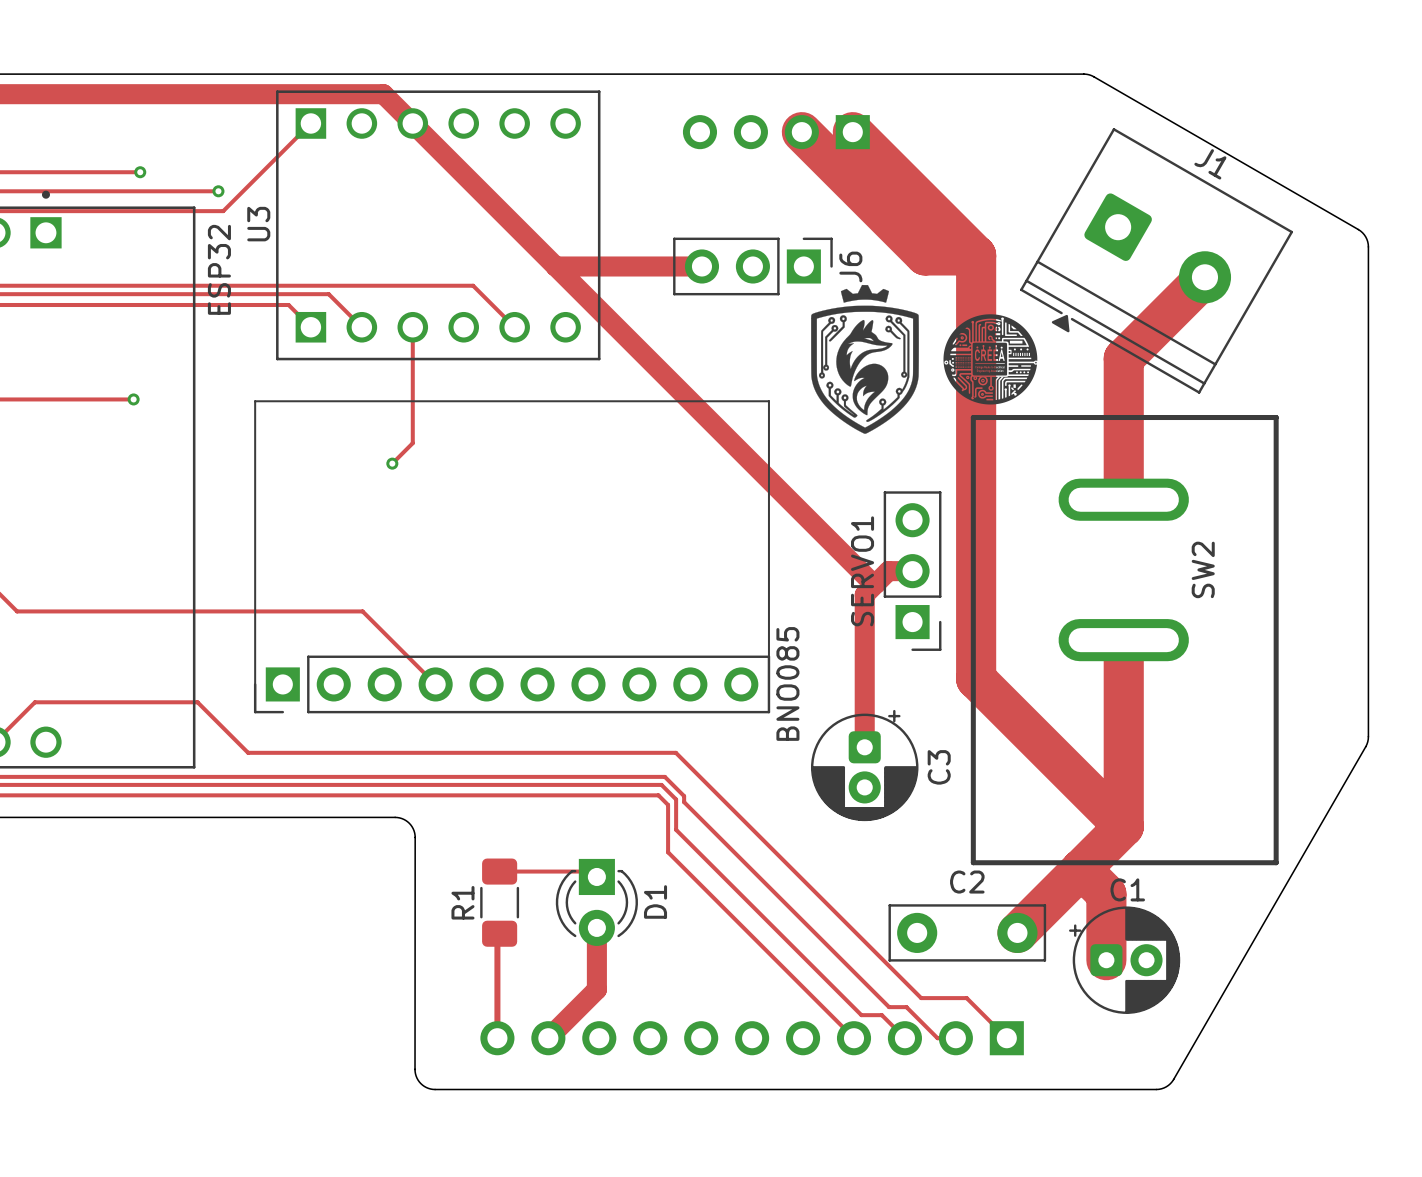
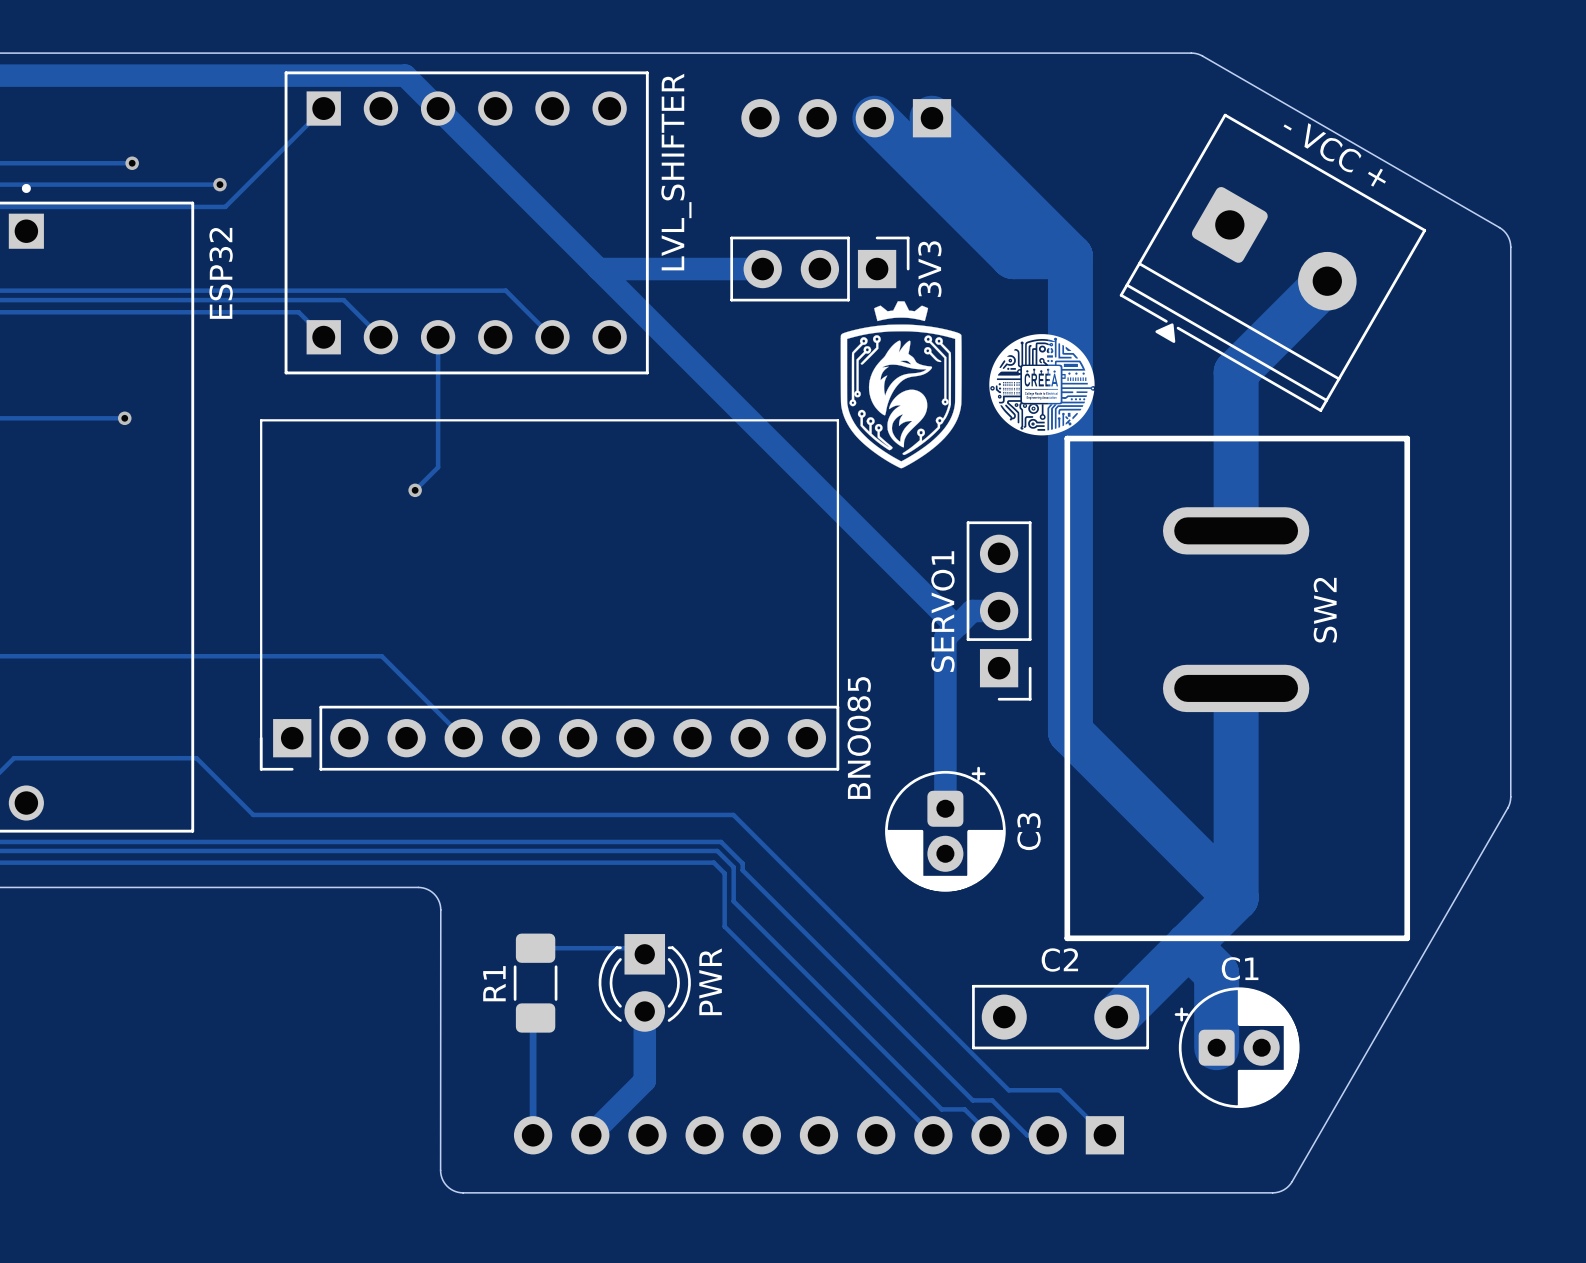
J1 name: J1 (1210, 164) -> - VCC + (1334, 154)
U3 name: U3 (258, 224) -> LVL_SHIFTER (676, 172)
J6 name: J6 (850, 266) -> 3V3 (929, 269)
drawing position: (864, 359) -> (901, 384)
drawing position: (990, 359) -> (1041, 384)
D1 name: D1 (655, 901) -> PWR (710, 981)

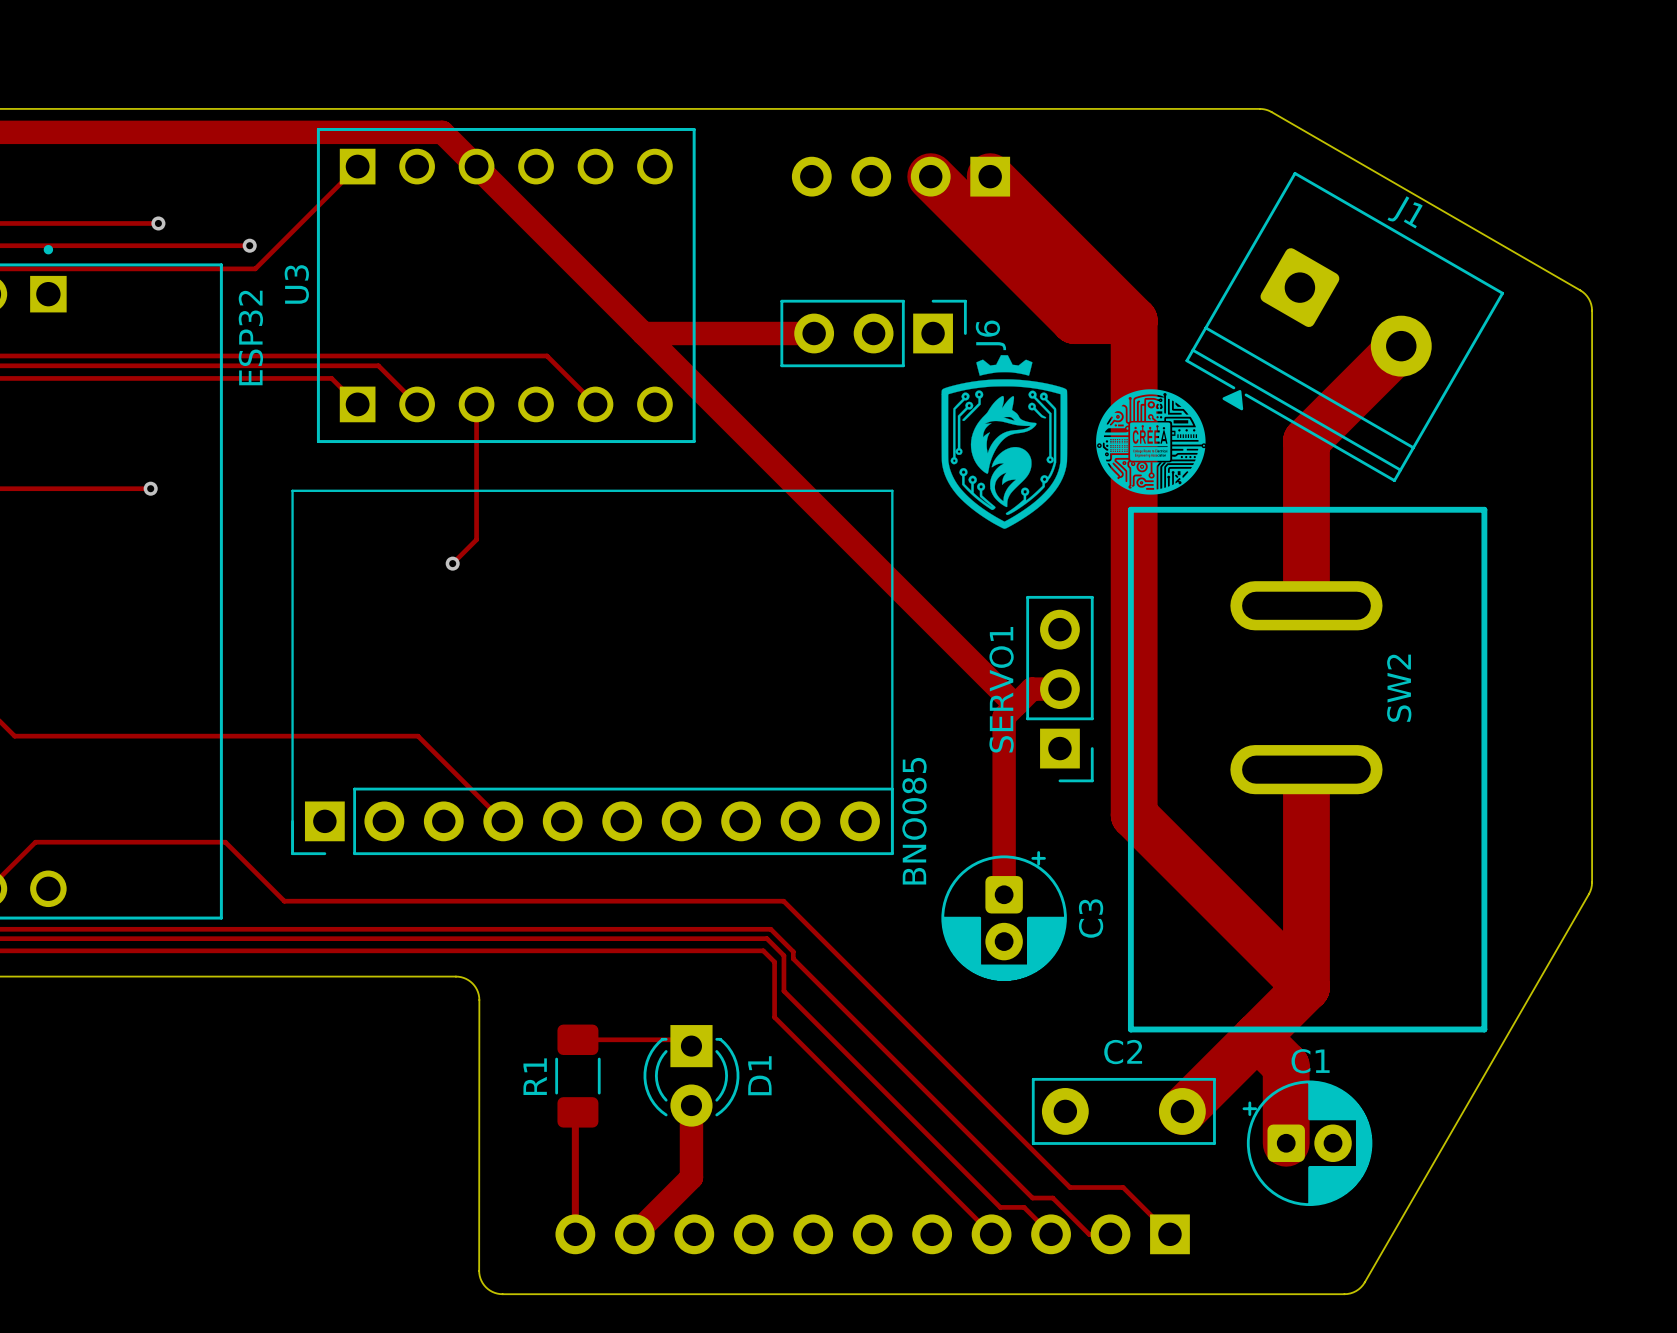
- VCC + name: - VCC + (1334, 154) -> J1 (1405, 212)
LVL_SHIFTER name: LVL_SHIFTER (676, 172) -> U3 (296, 284)
3V3 name: 3V3 (929, 269) -> J6 (990, 335)
drawing position: (901, 384) -> (1004, 441)
drawing position: (1041, 384) -> (1150, 441)
PWR name: PWR (710, 981) -> D1 (759, 1075)

